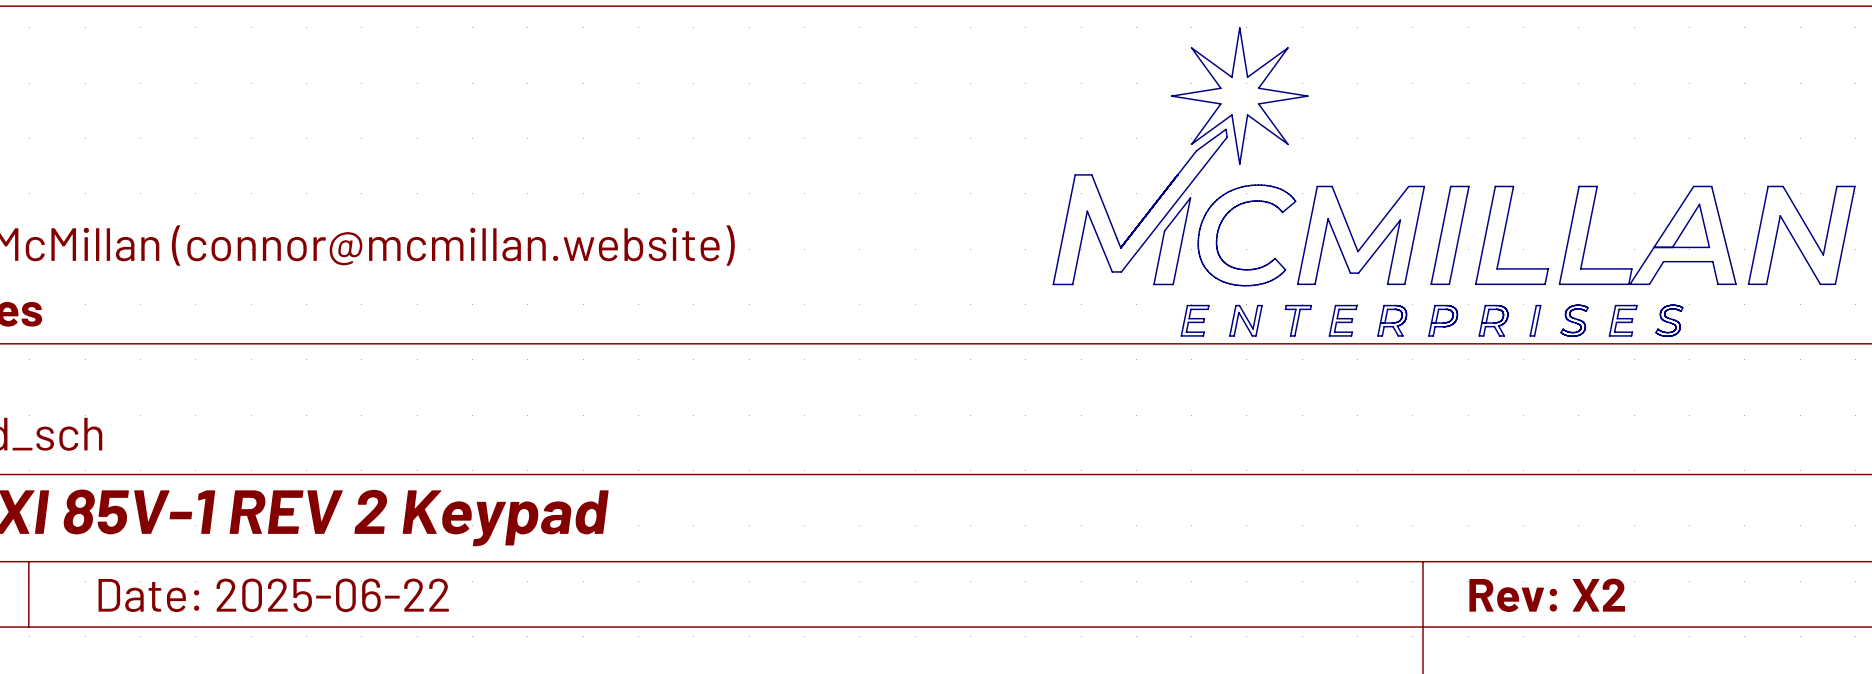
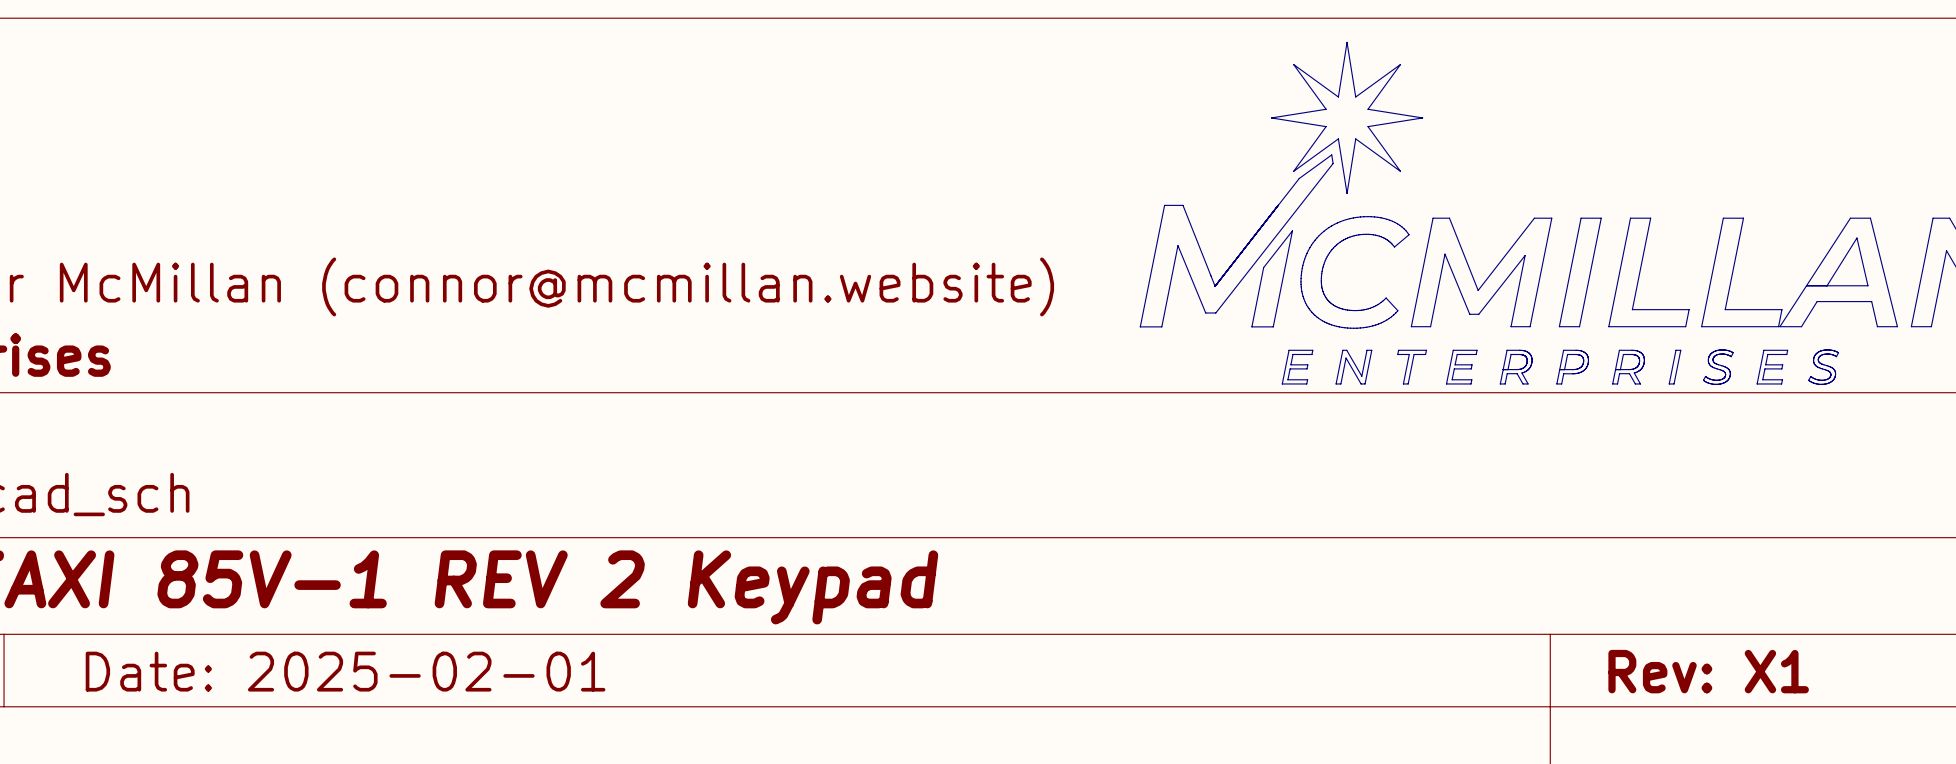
title block: Date: 2025-06-22 (273, 595) -> Date: 2025-02-01 (345, 671)
title block: Rev: X2 (1547, 595) -> Rev: X1 (1708, 671)

